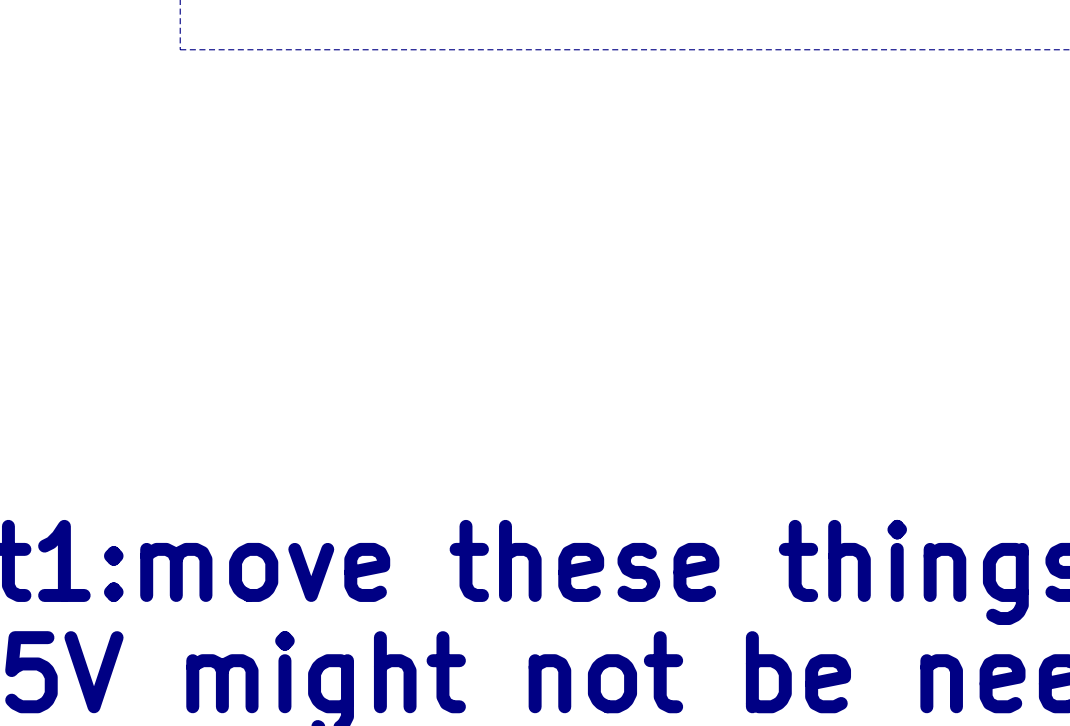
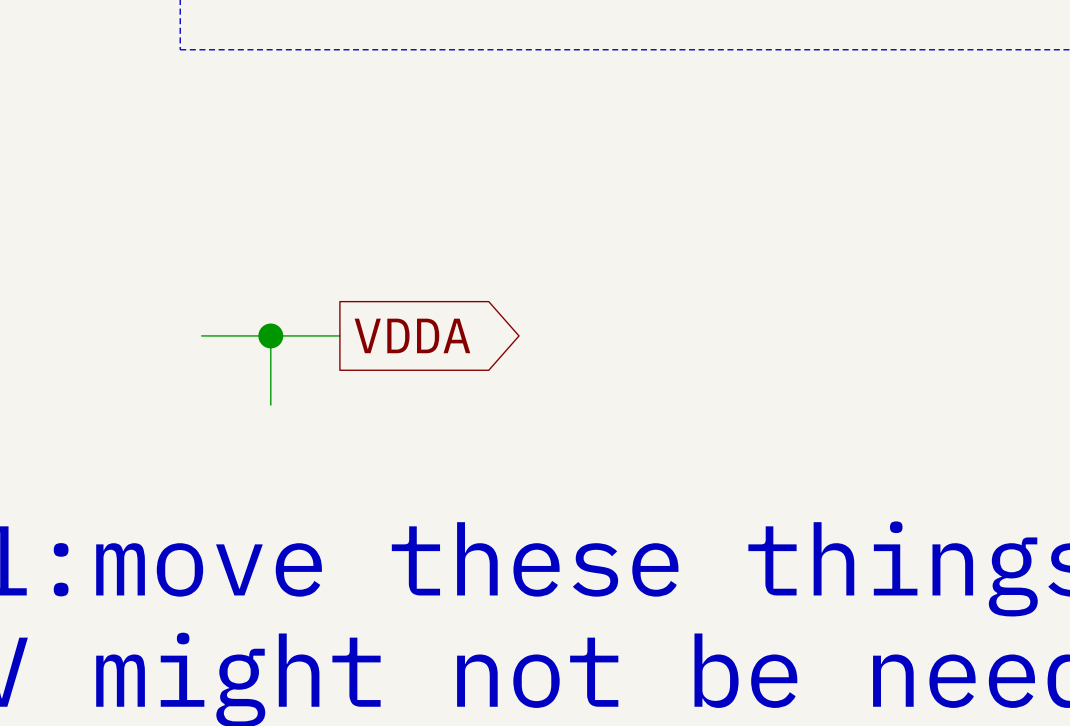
wire: none -> (201, 335) (339, 335)
wire: none -> (270, 335) (270, 405)
junction: none -> (270, 335)
global label: none -> VDDA (412, 335)

